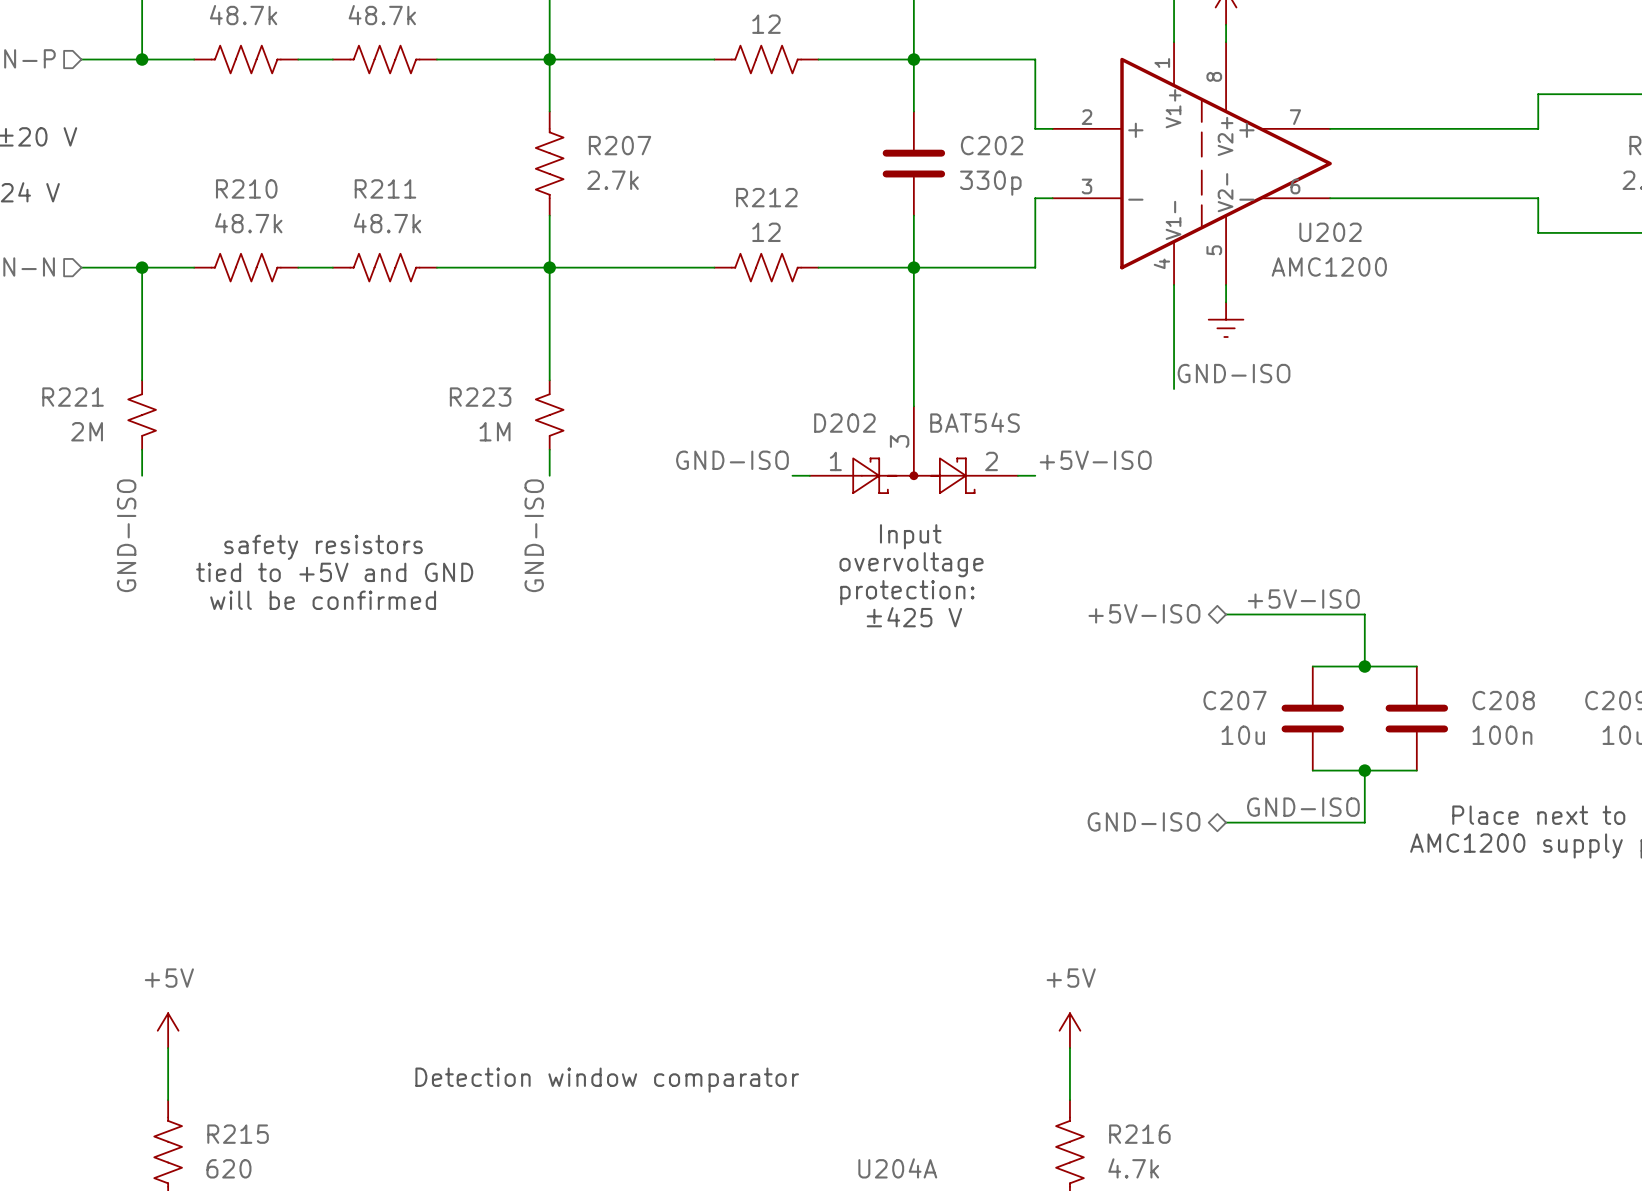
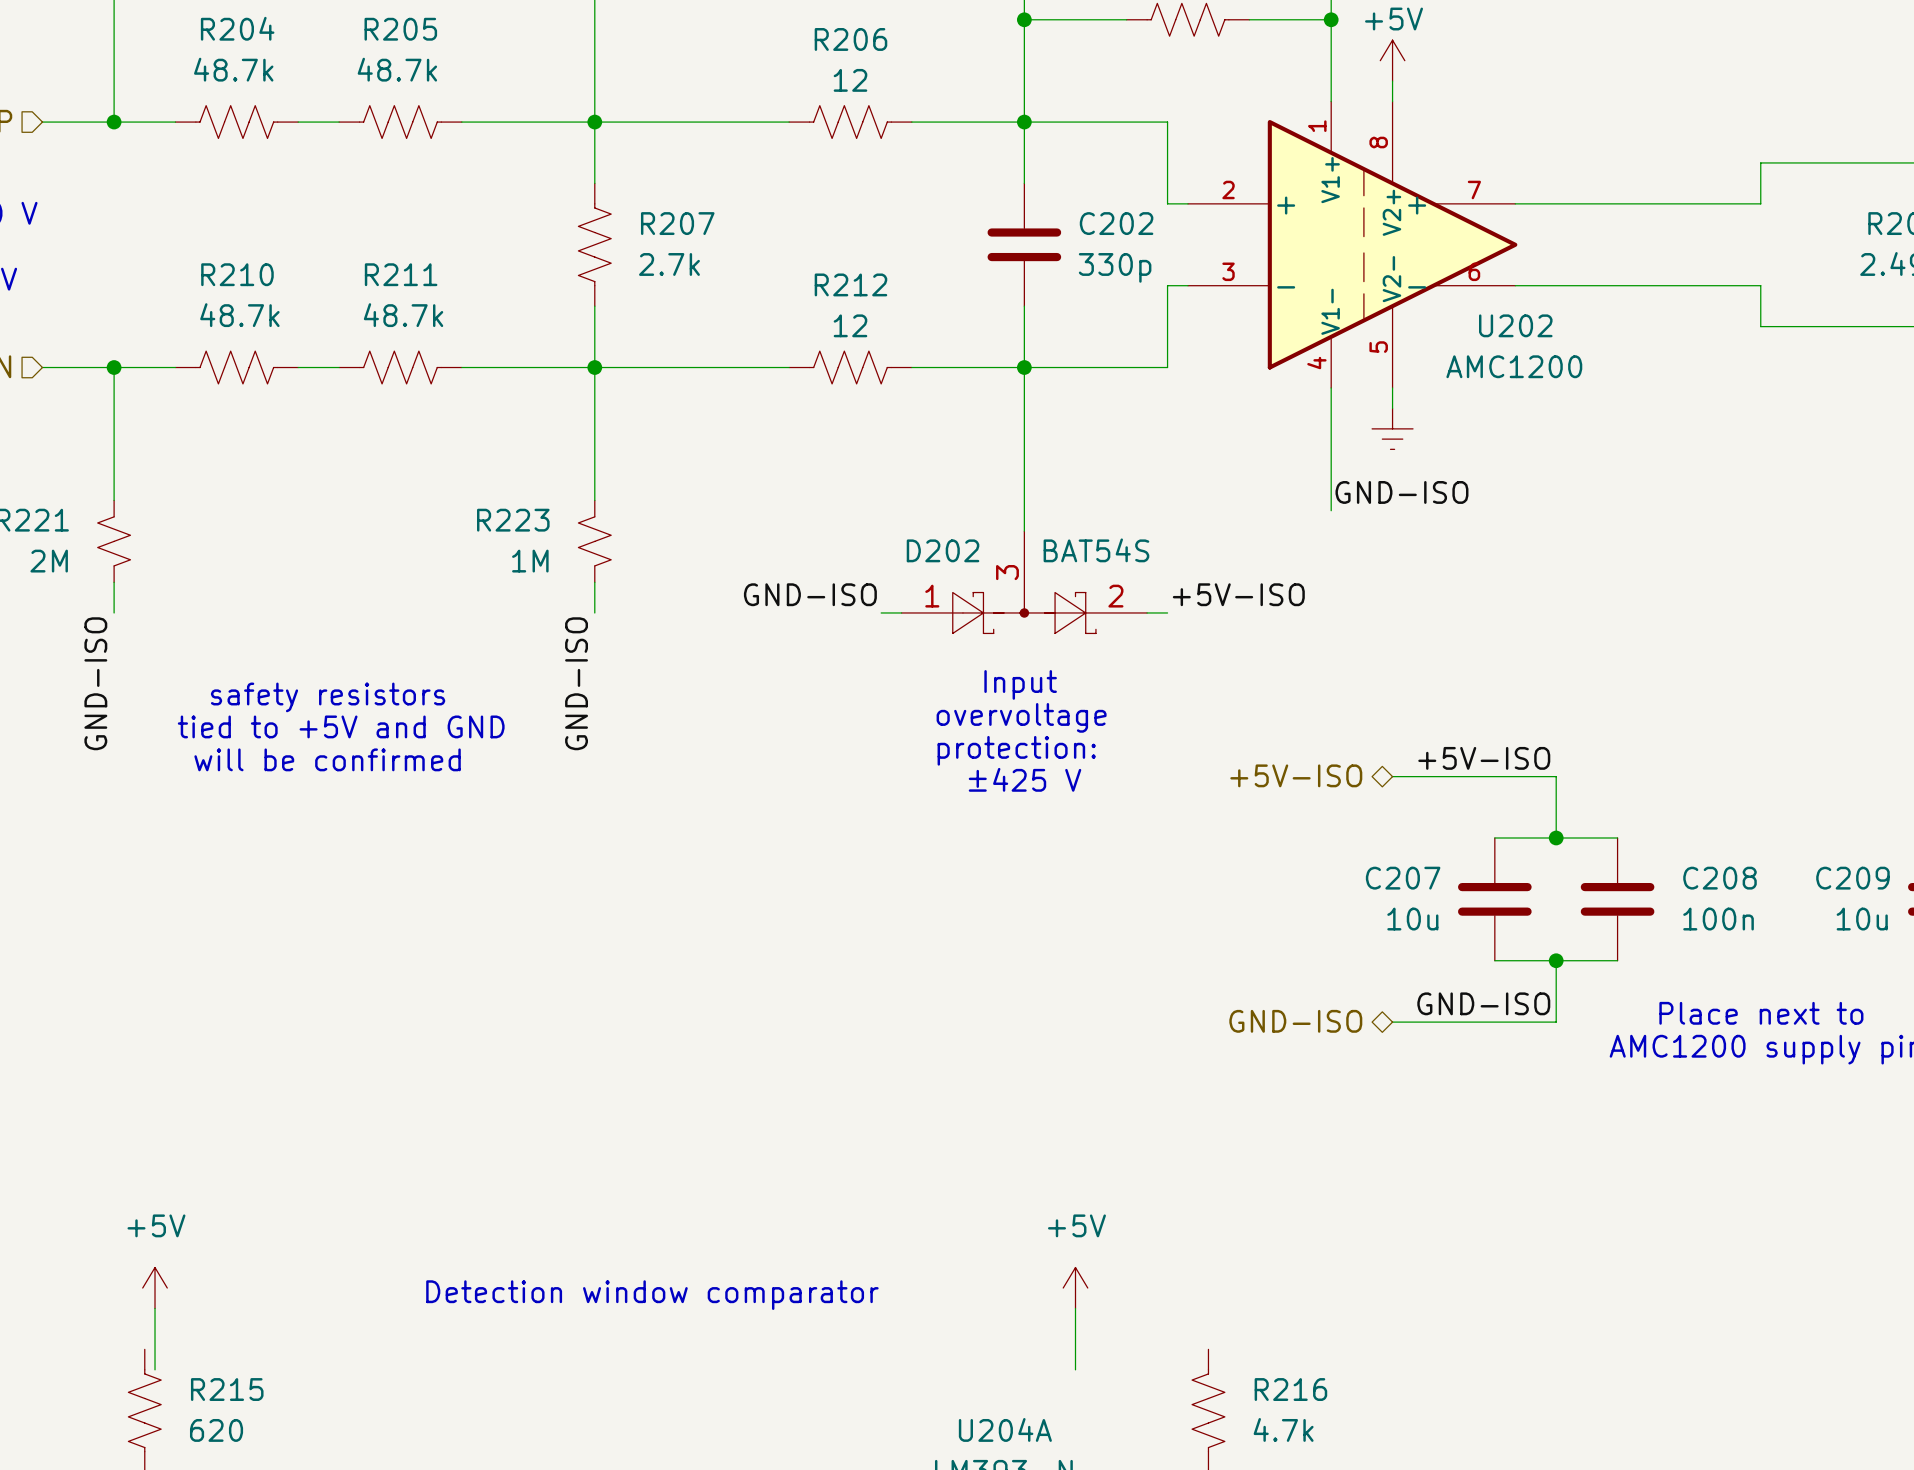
power symbol position: +5V (168, 1030) -> +5V (155, 1288)
power symbol position: +5V (1069, 1030) -> +5V (1075, 1288)
wire: (168, 1048) (168, 1100) -> (155, 1308) (155, 1369)
wire: (1069, 1048) (1069, 1100) -> (1075, 1308) (1075, 1369)
text position: Detection window comparator (607, 1080) -> Detection window comparator (652, 1295)

